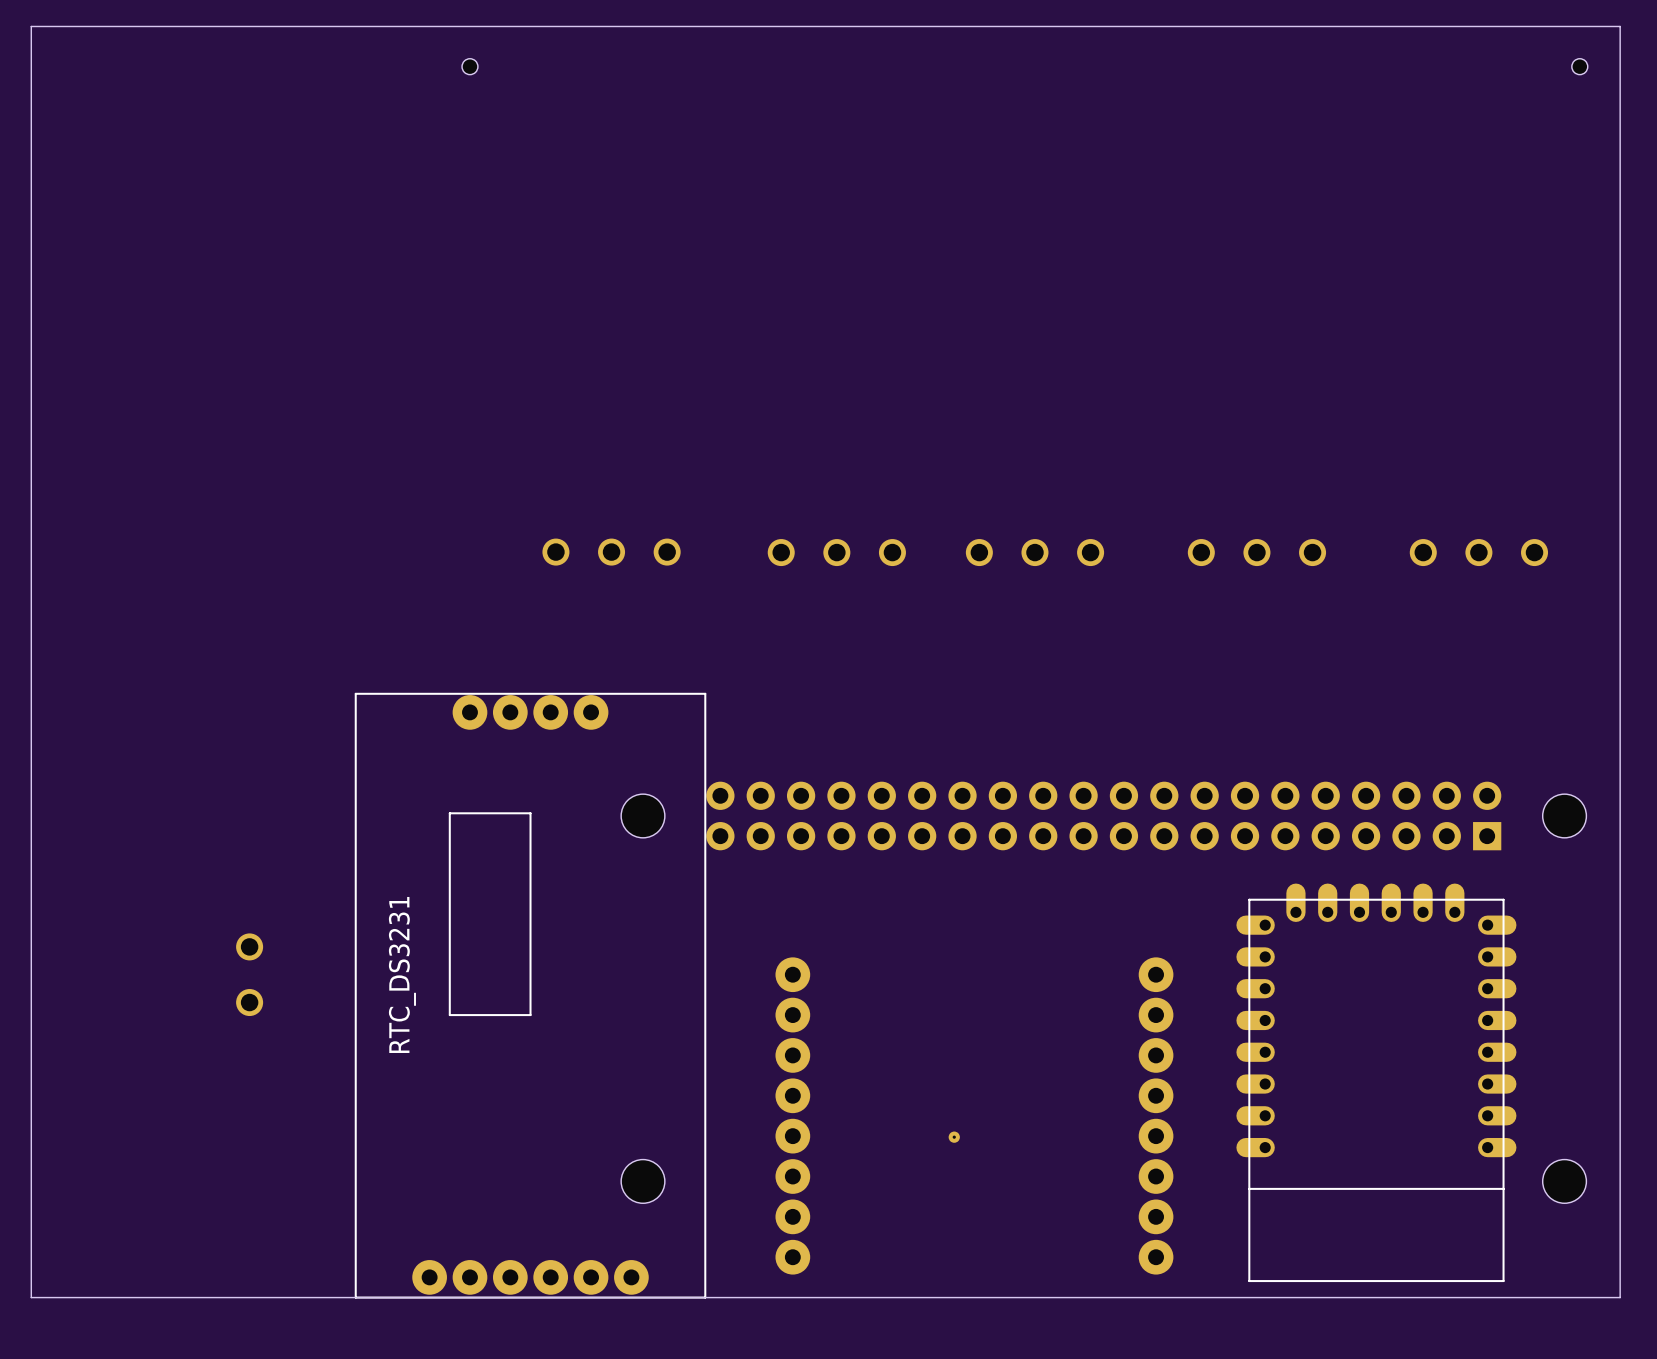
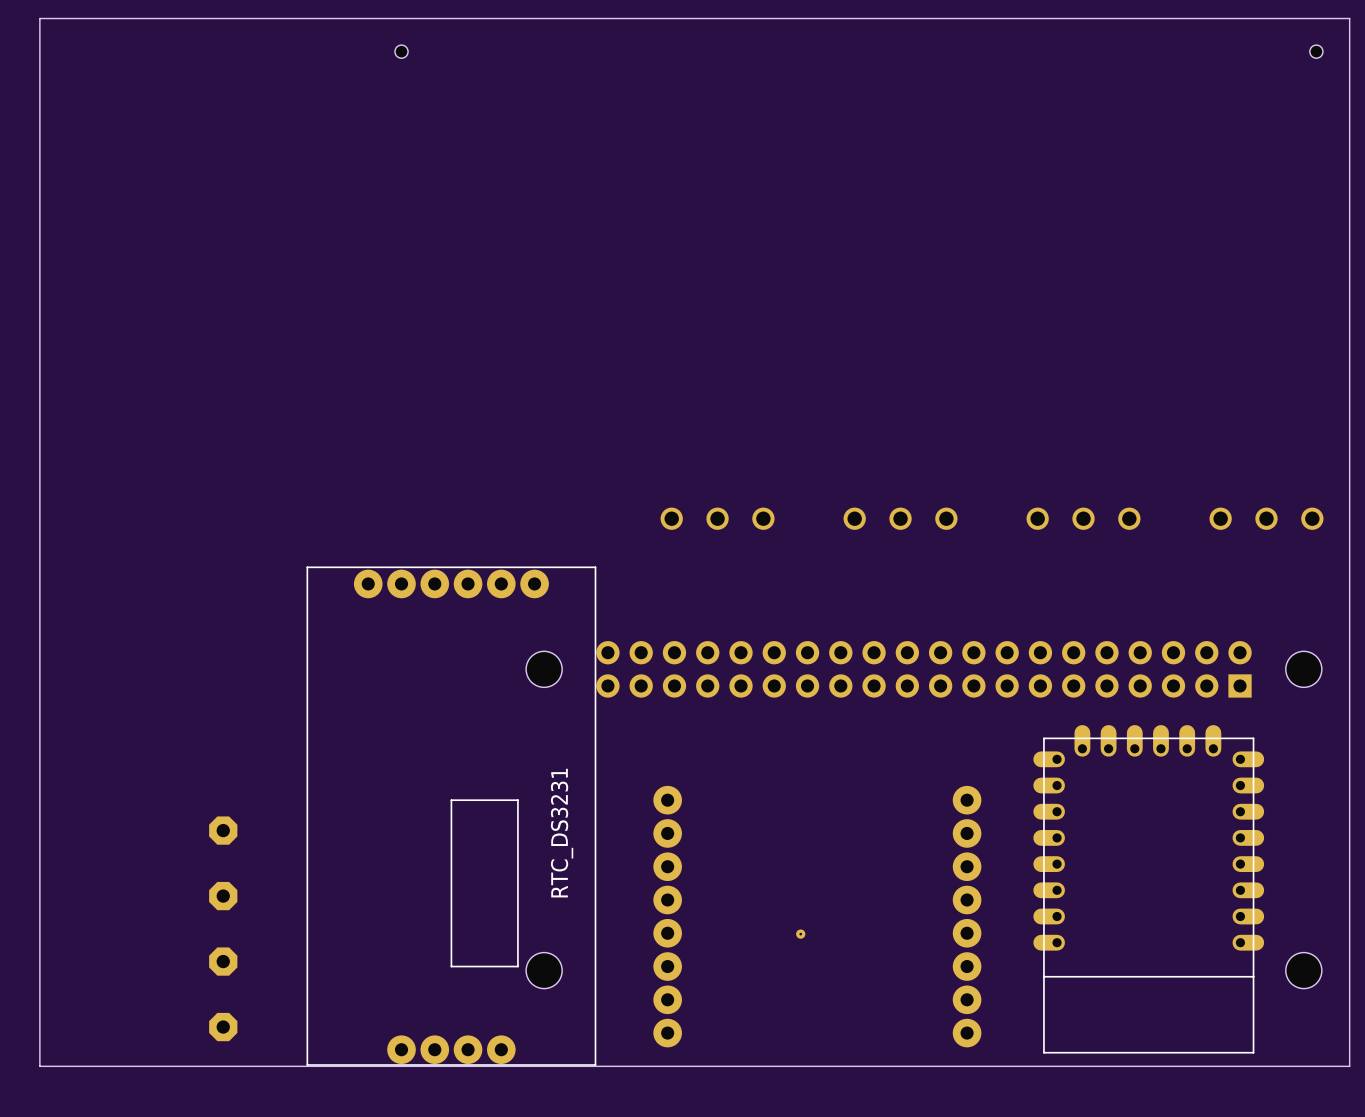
part: (611, 552) -> none
part position: (836, 552) -> (717, 518)
part position: (1034, 552) -> (900, 518)
part position: (1256, 552) -> (1083, 518)
part position: (1478, 552) -> (1266, 518)
part footprint: [354, 692, 707, 1299] -> [306, 566, 597, 1066]
part: (249, 974) -> none
part: none -> (223, 830)
part: none -> (223, 896)
part: none -> (223, 961)
part: none -> (223, 1027)

